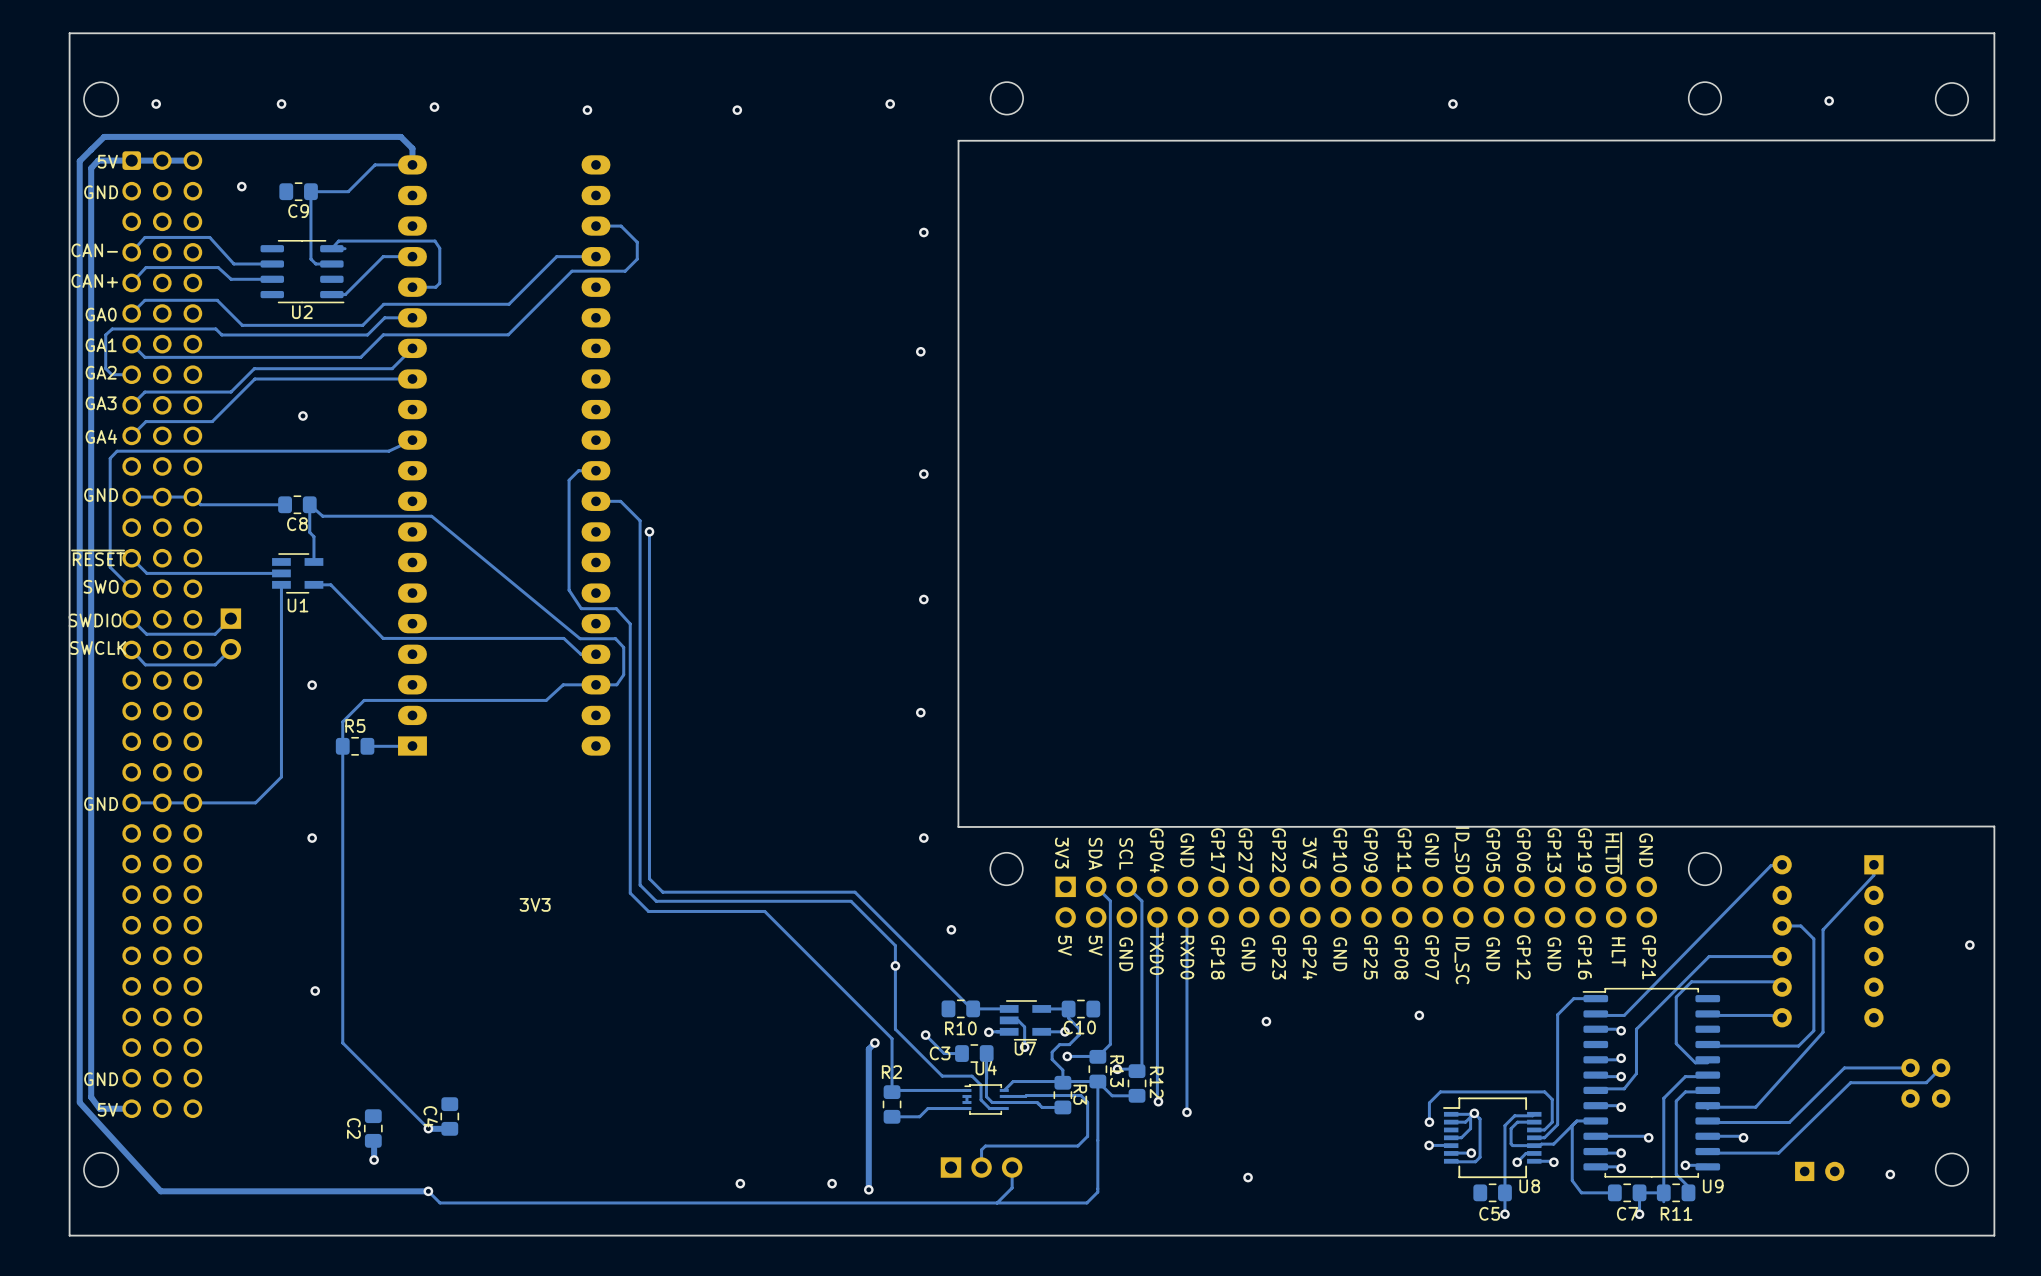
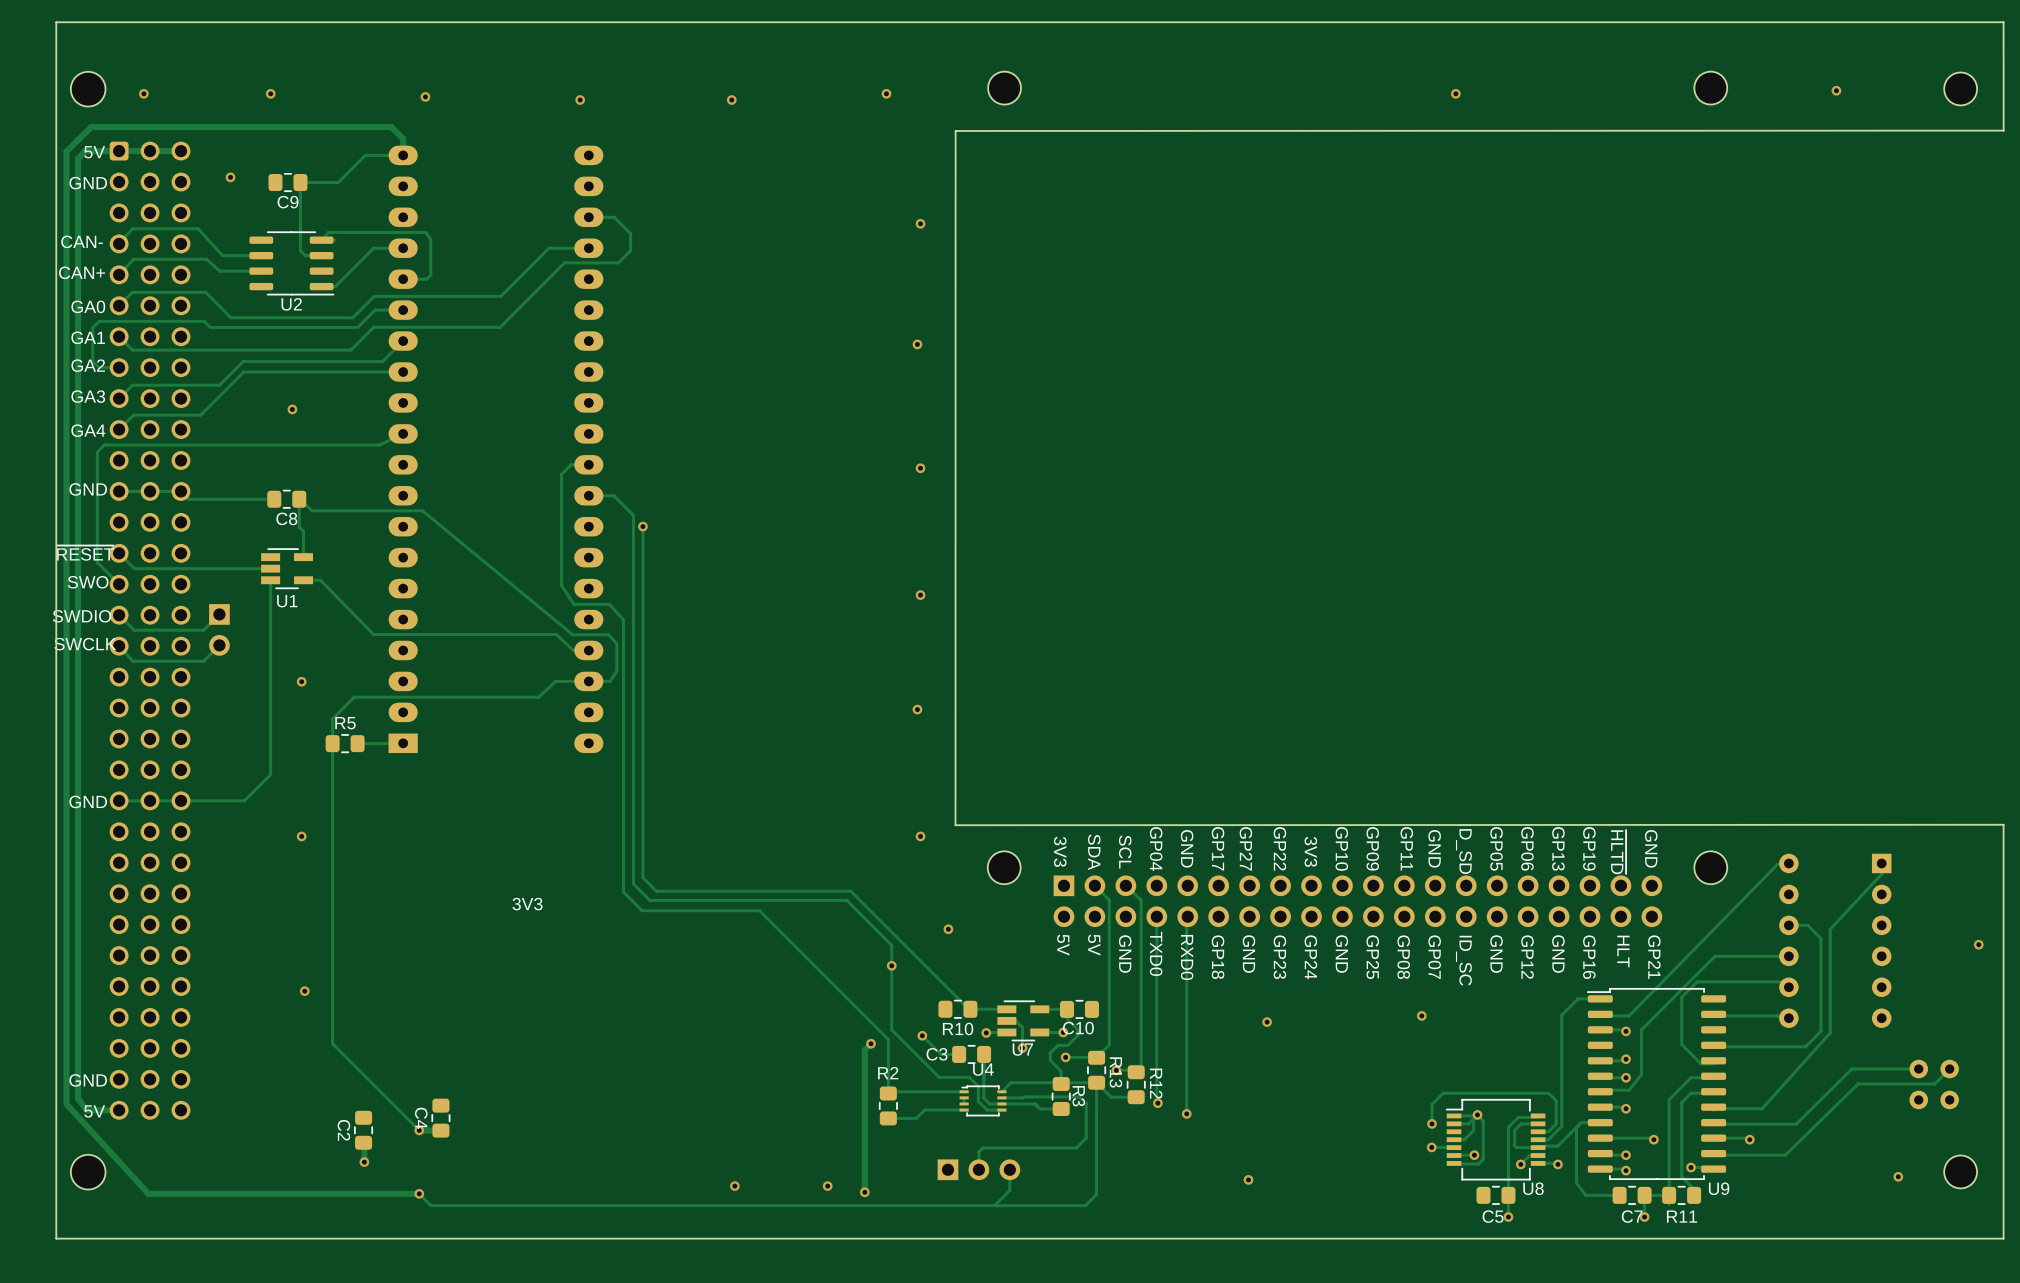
part: (1819, 1171) -> none

